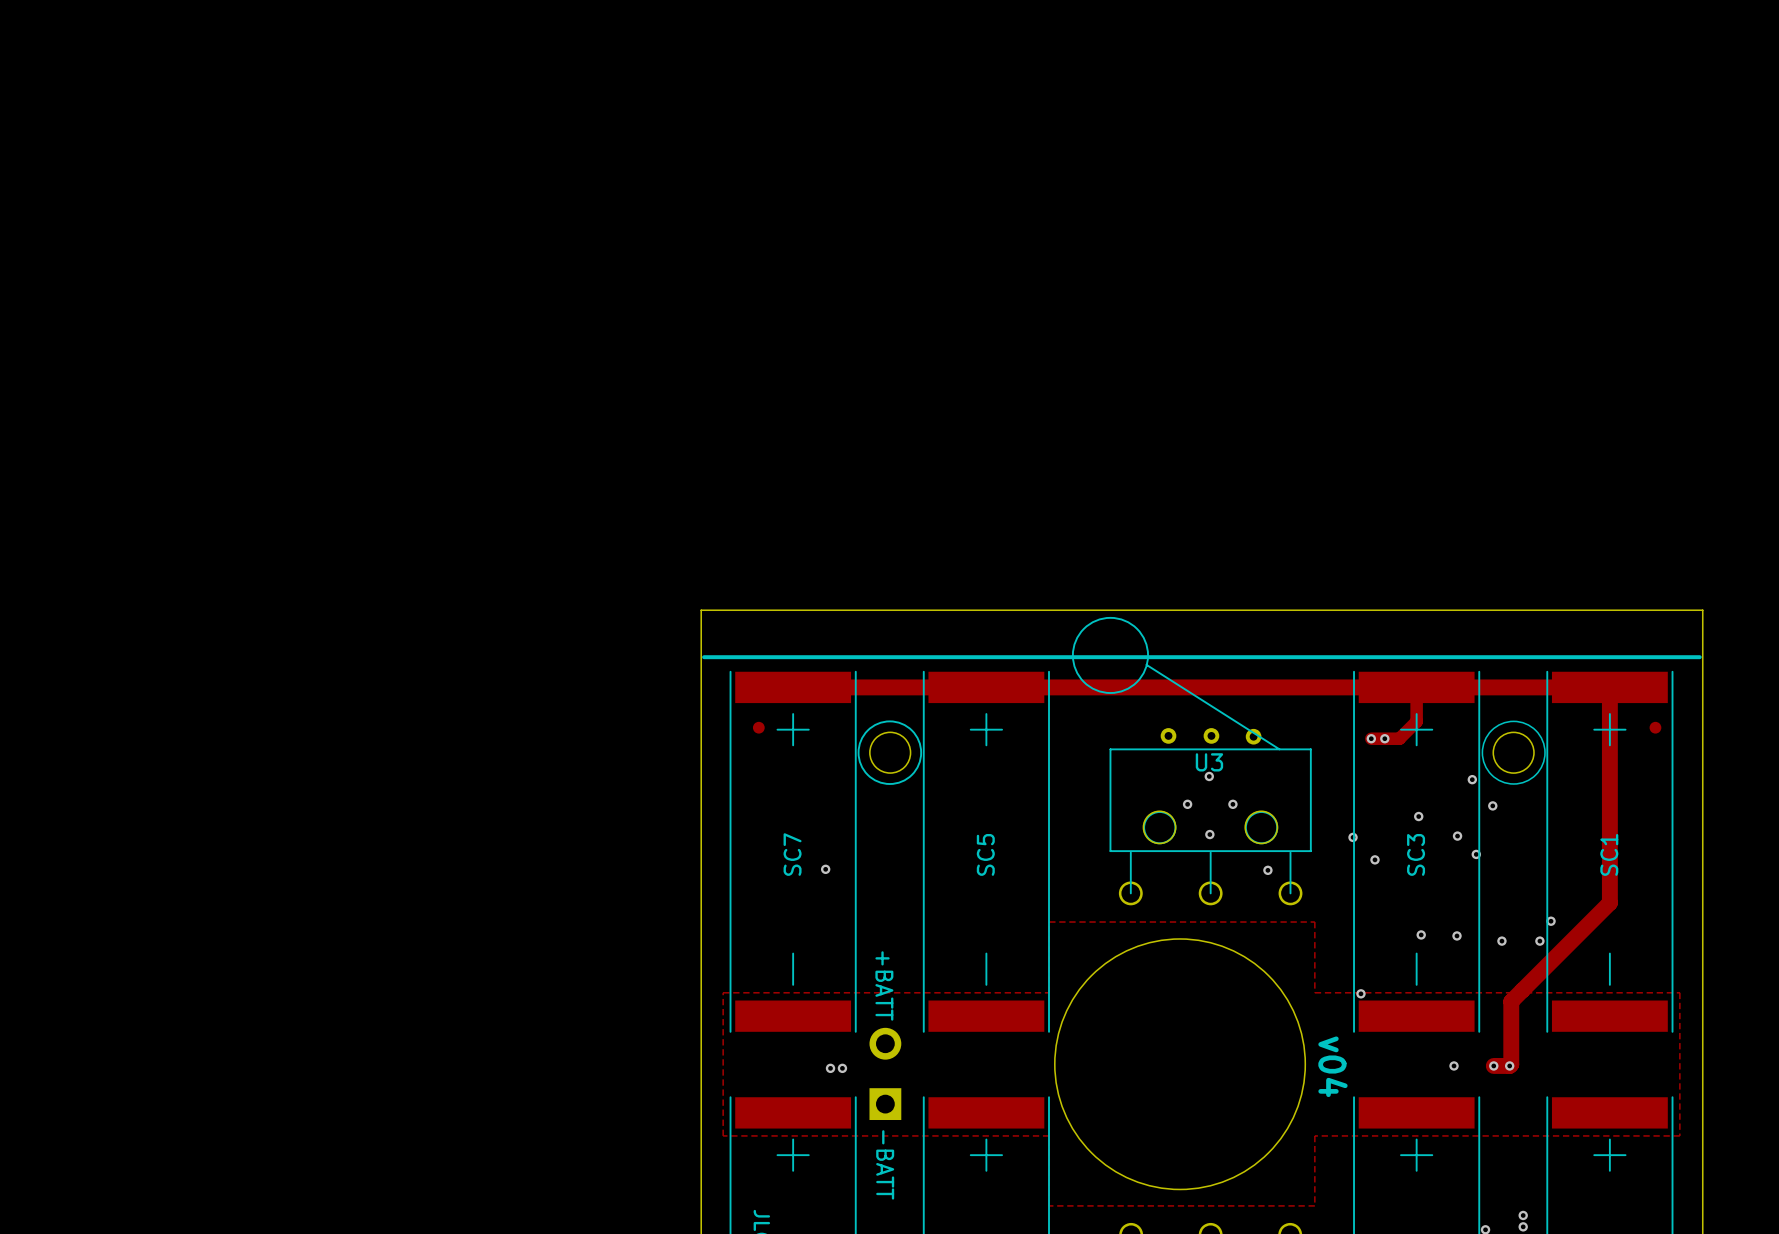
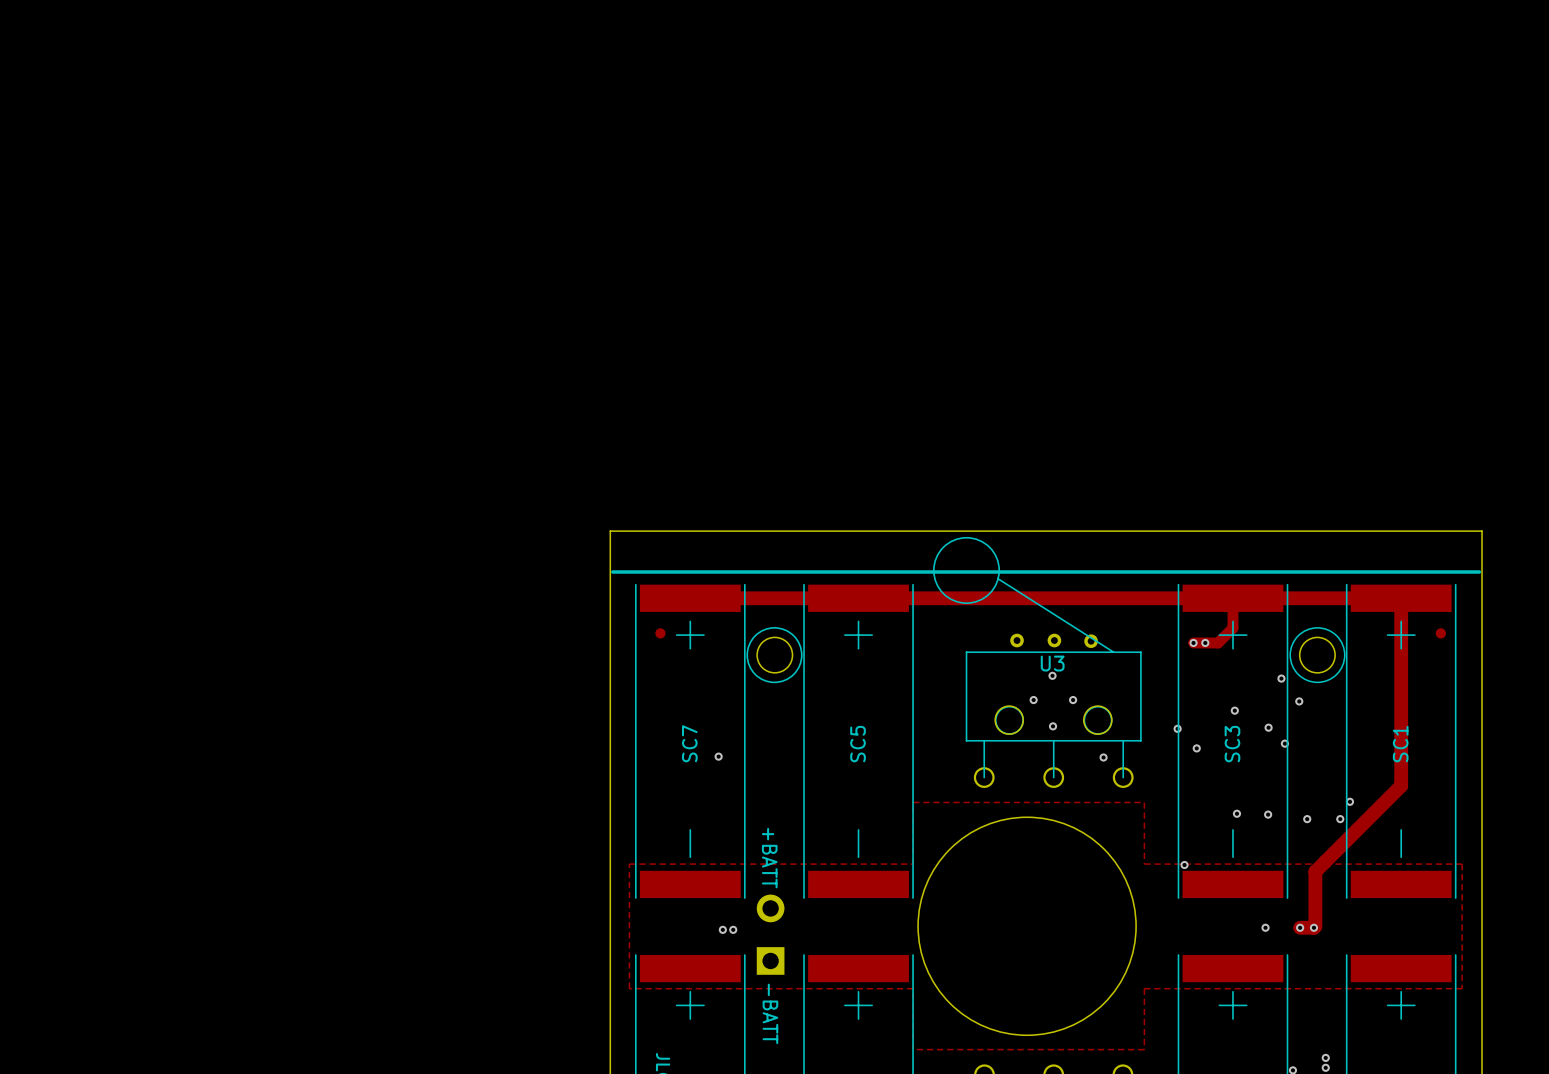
text: v04 (1332, 1066) -> none

